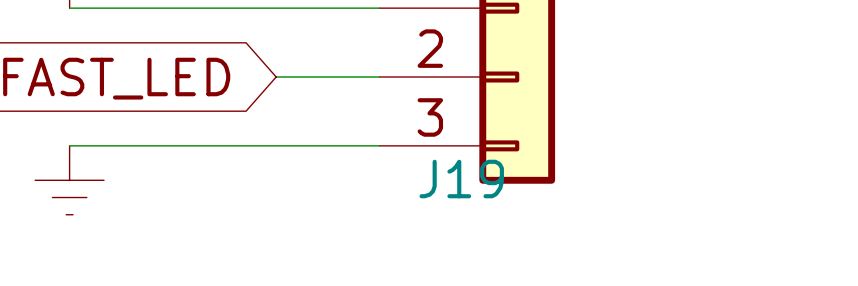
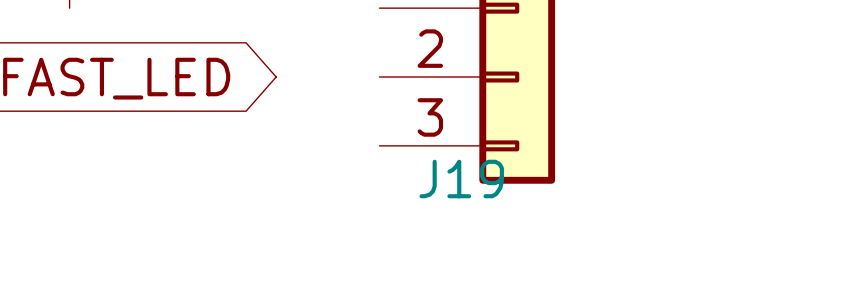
wire: (69, 8) (379, 8) -> none
wire: (276, 77) (379, 77) -> none
wire: (69, 145) (379, 145) -> none
power symbol: (69, 180) -> none

